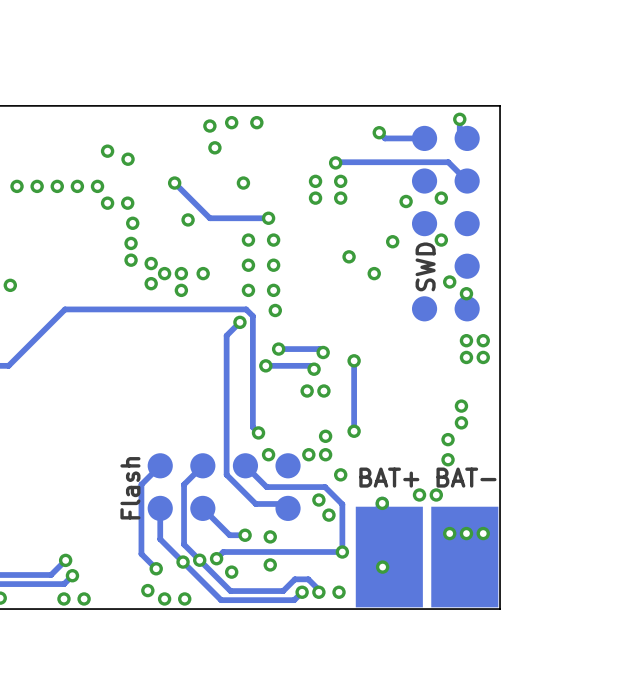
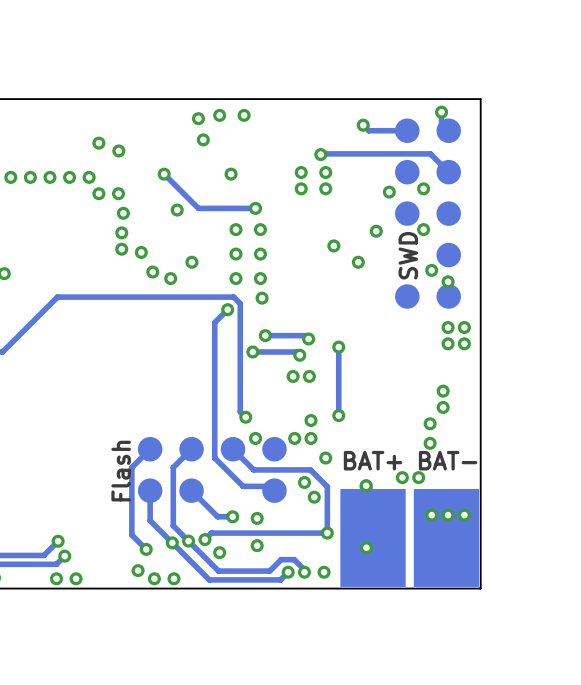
via: (164, 273) -> none
via: (181, 273) -> none
via: (151, 283) -> none
via: none -> (152, 272)

